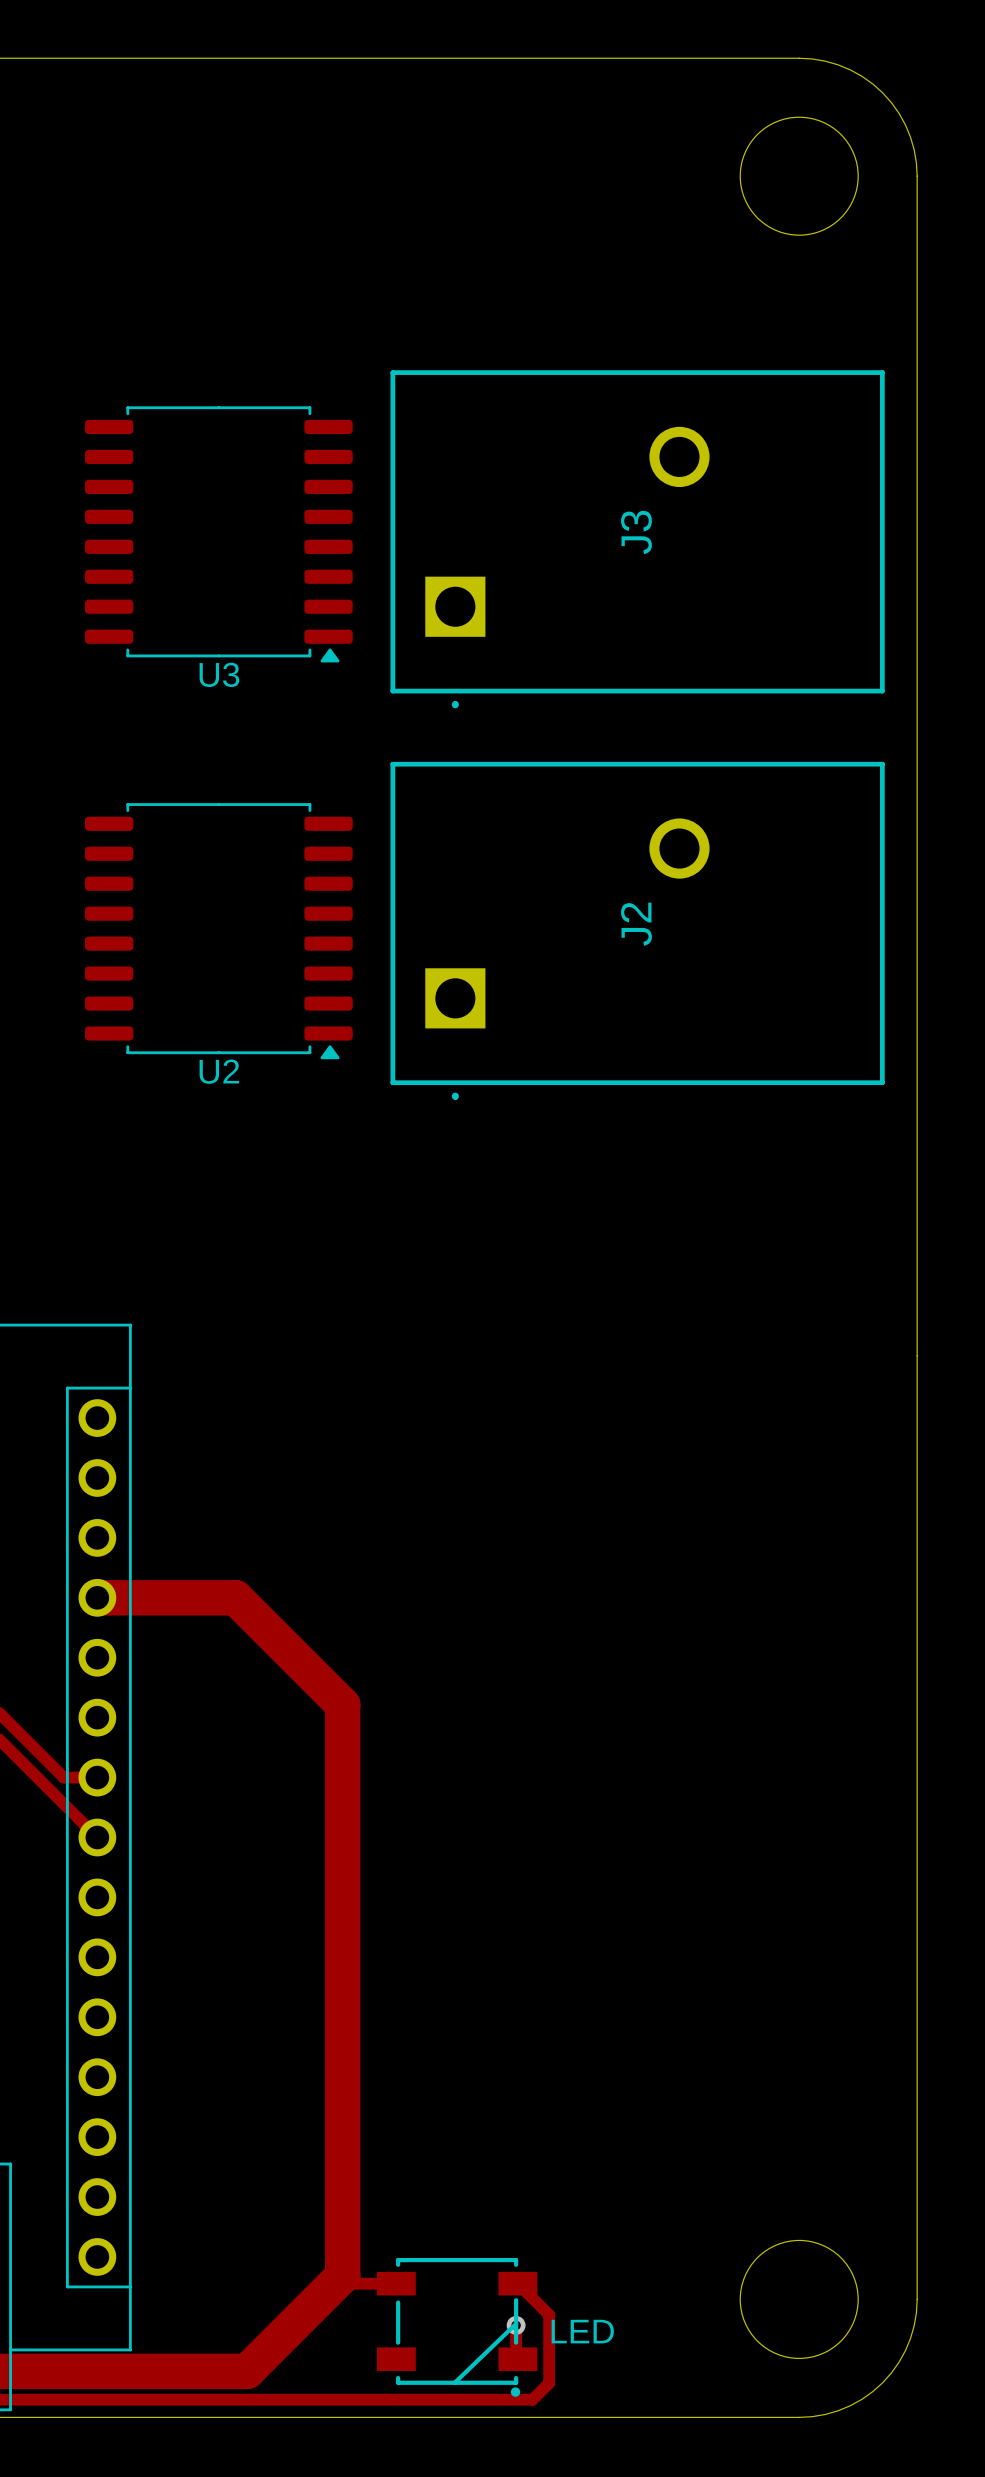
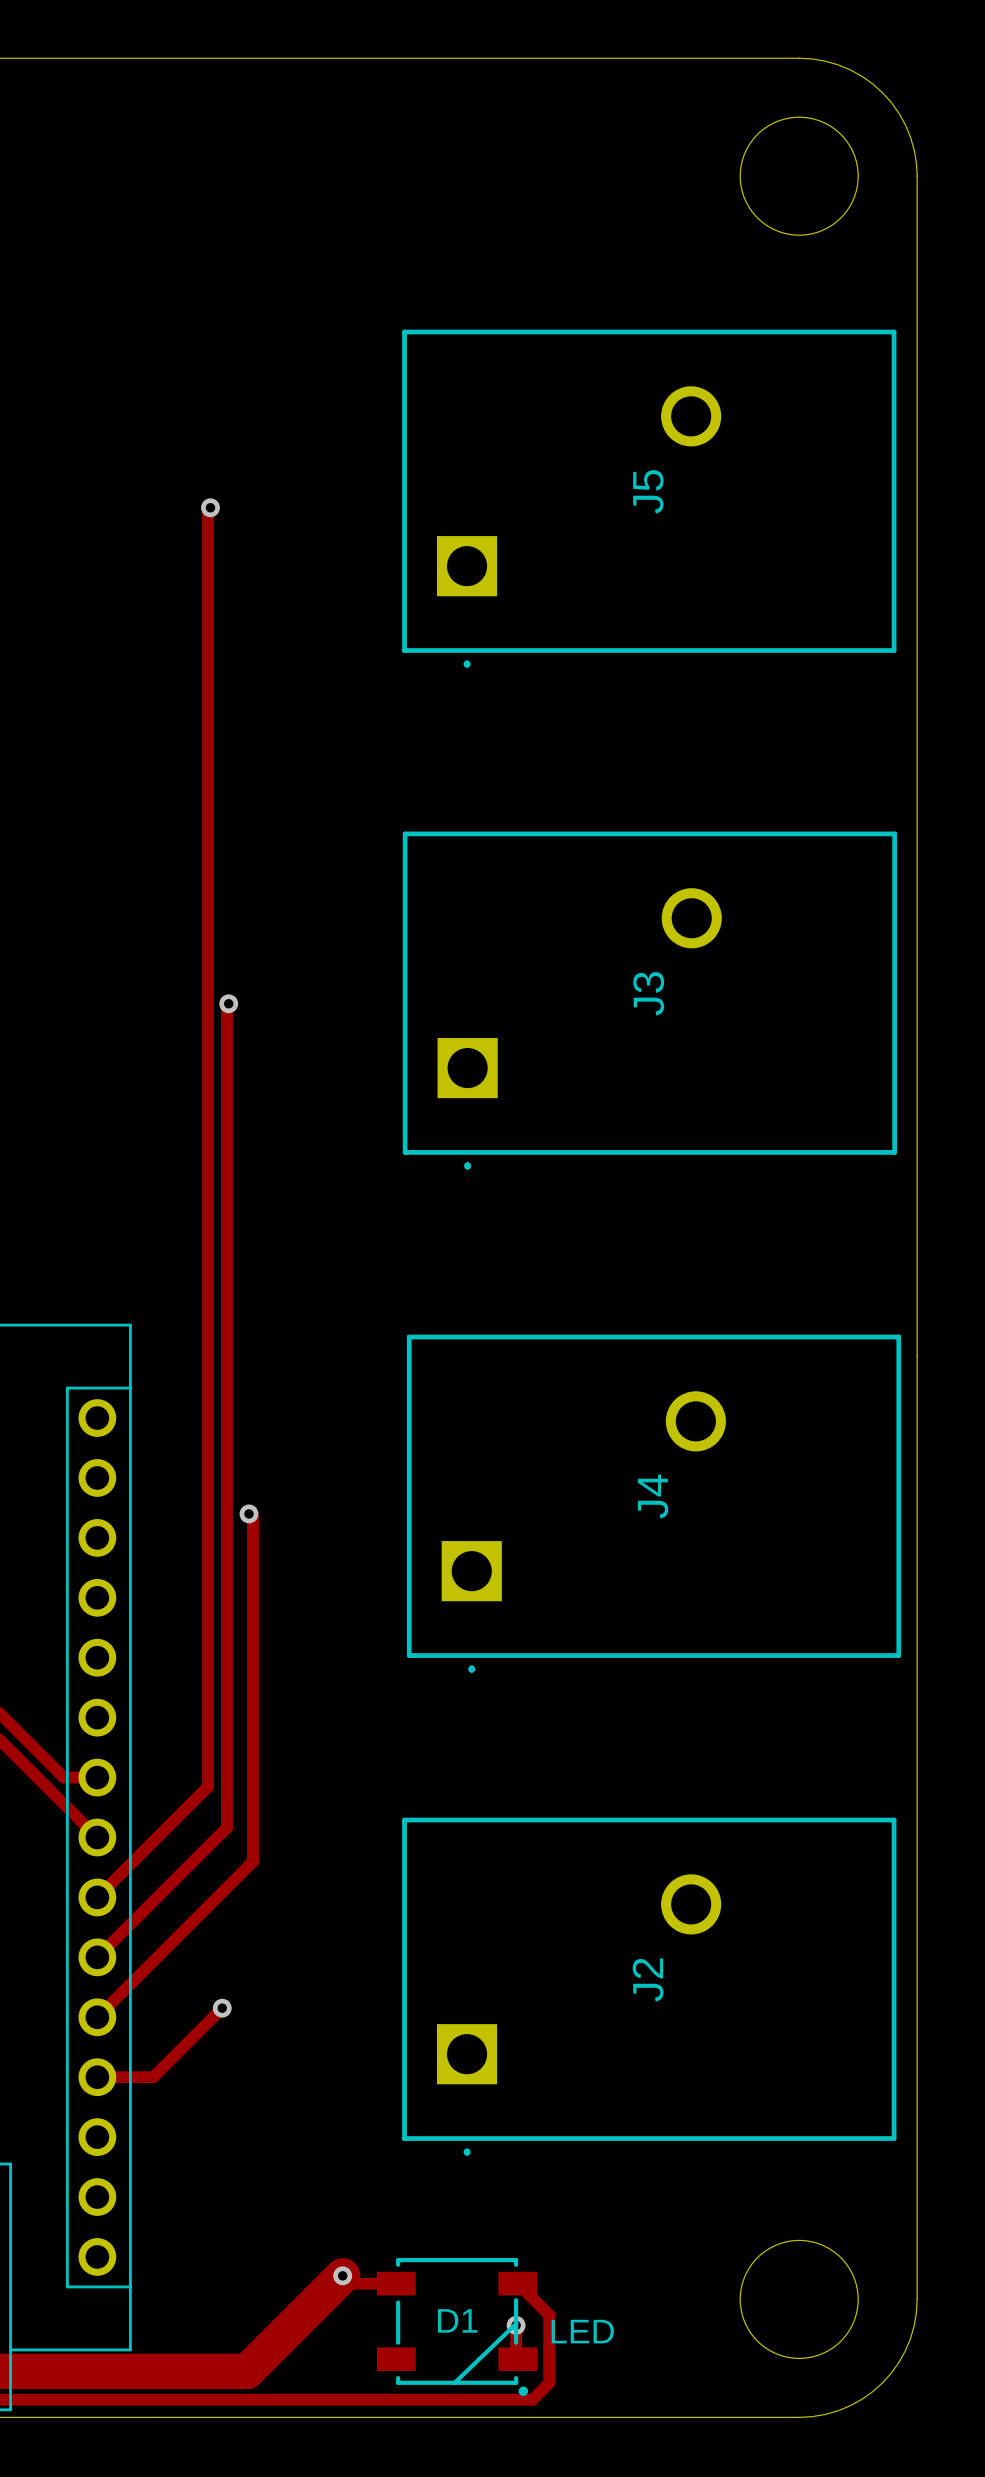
J5: none -> (649, 498)
track: none -> (210, 507) (208, 510) (208, 1786) (97, 1897)
via: none -> (210, 507)
U3: (218, 534) -> none
J3 position: (637, 539) -> (649, 1000)
J2 position: (637, 930) -> (649, 1986)
U2: (218, 931) -> none
track: none -> (228, 1003) (227, 1005) (227, 1827) (97, 1957)
via: none -> (228, 1003)
J4: none -> (654, 1503)
track: none -> (249, 1513) (252, 1517) (252, 1861) (97, 2017)
via: none -> (249, 1513)
track: (97, 1597) (235, 1597) (342, 1704) (342, 2275) -> none
track: none -> (222, 2008) (153, 2077) (97, 2077)
via: none -> (222, 2008)
via: none -> (342, 2275)
D1: none -> (457, 2326)
part: (457, 2327) -> none

